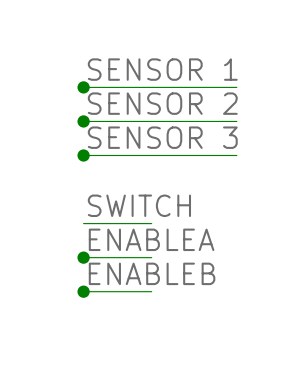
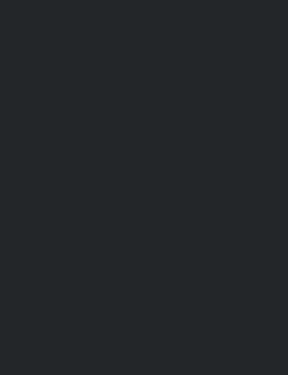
label: SENSOR 1 (162, 69) -> none
wire: (83, 87) (236, 87) -> none
junction: (83, 87) -> none
label: SENSOR 2 (162, 103) -> none
wire: (83, 121) (236, 121) -> none
junction: (83, 121) -> none
label: SENSOR 3 (162, 137) -> none
wire: (83, 155) (236, 155) -> none
junction: (83, 155) -> none
label: SWITCH (139, 205) -> none
wire: (83, 223) (151, 223) -> none
label: ENABLEA (151, 239) -> none
wire: (83, 257) (151, 257) -> none
junction: (83, 257) -> none
label: ENABLEB (152, 273) -> none
wire: (83, 291) (151, 291) -> none
junction: (83, 291) -> none

